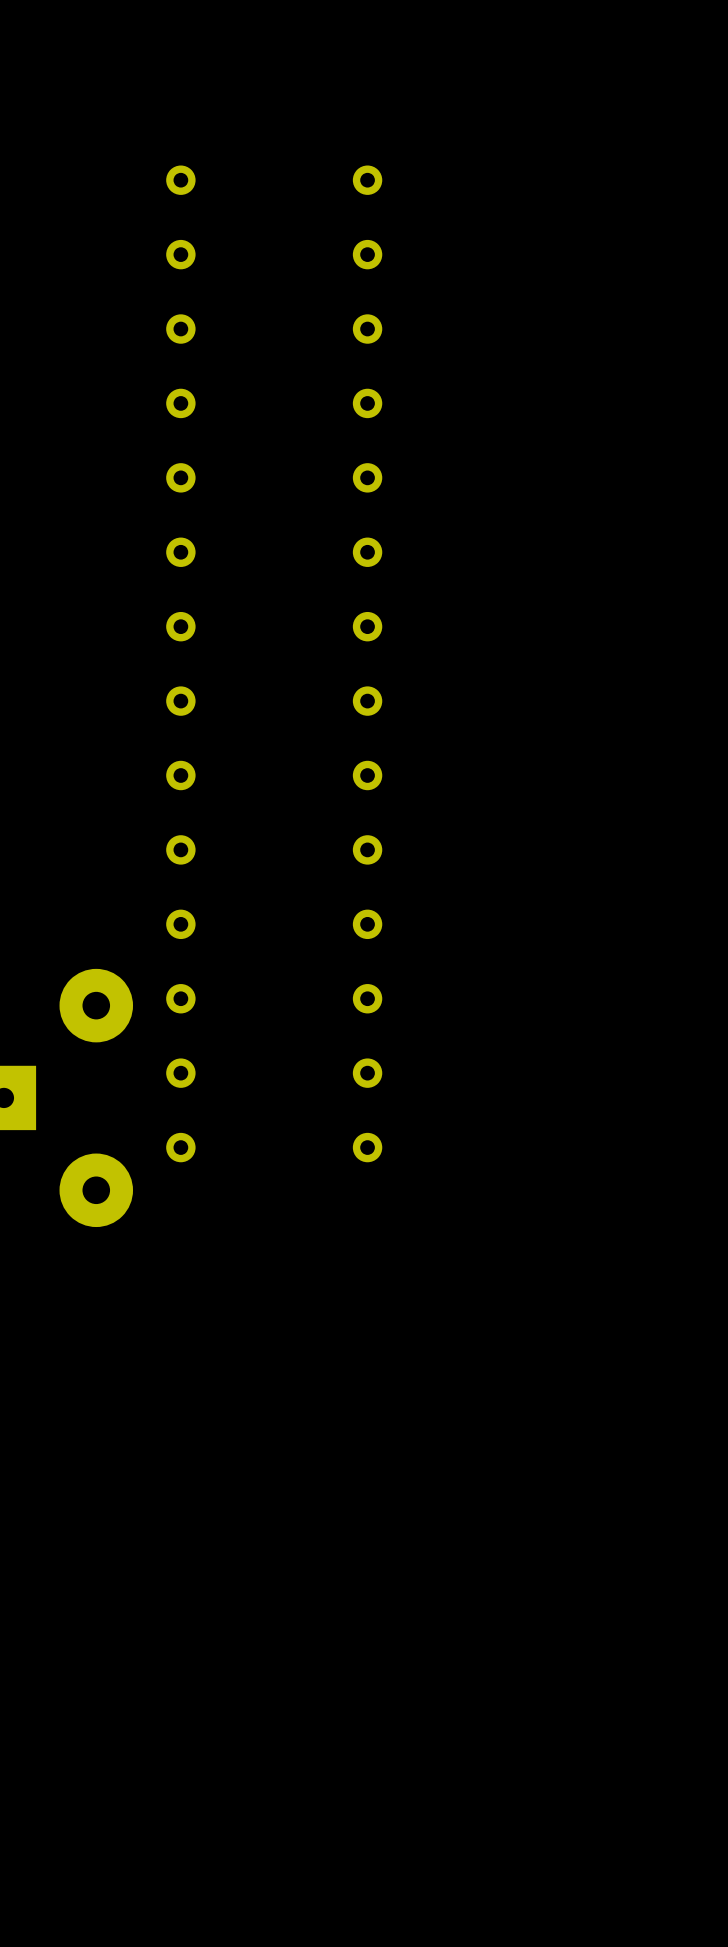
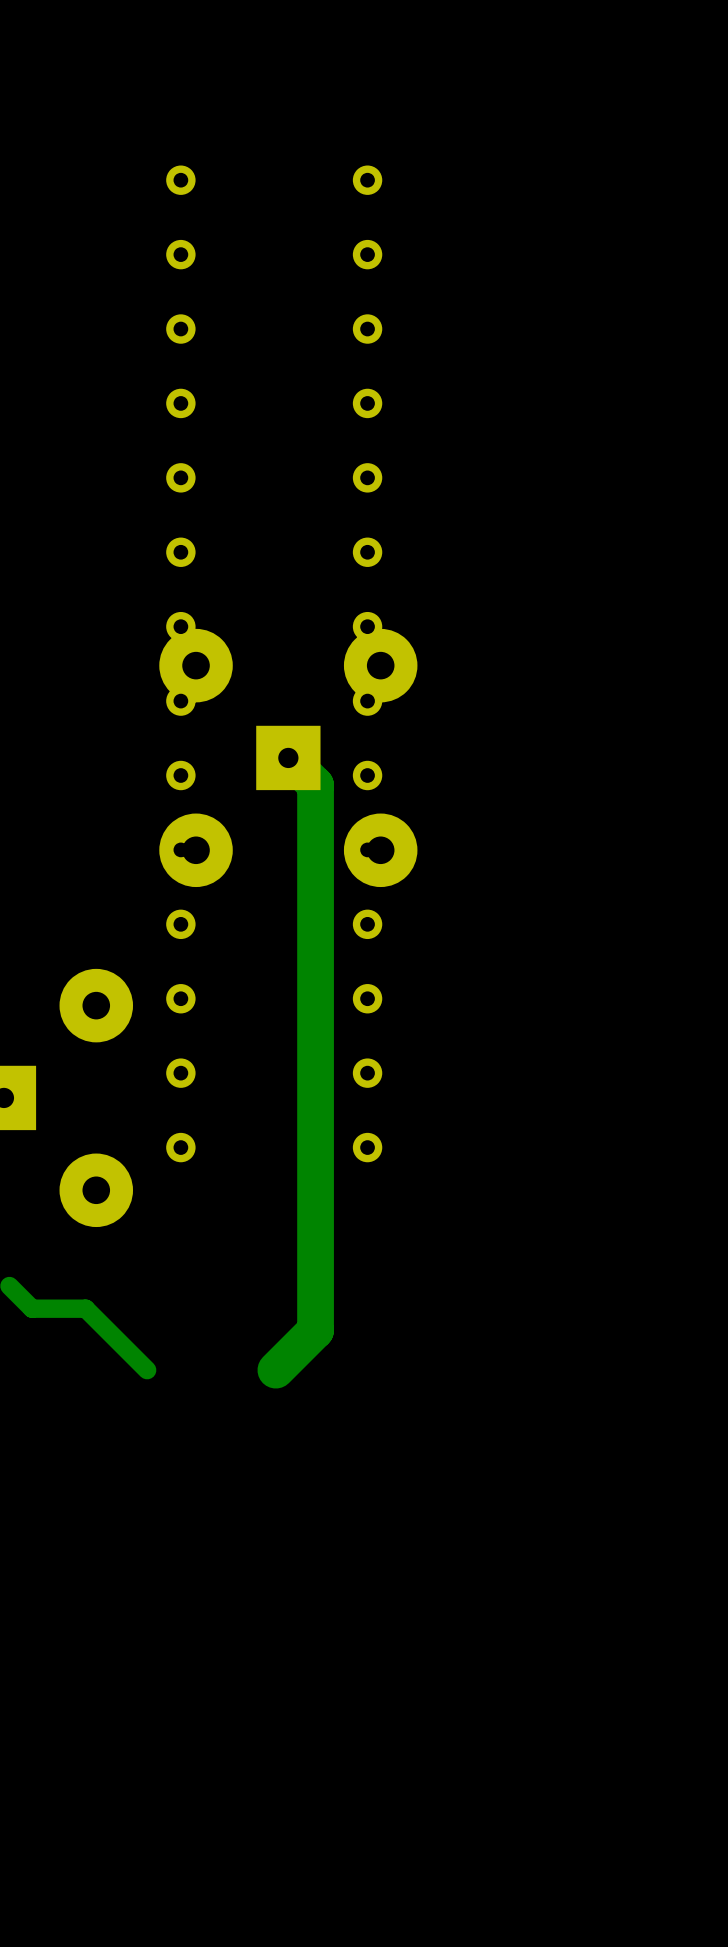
track: none -> (288, 757) (315, 785) (315, 1330) (275, 1370)
part: none -> (288, 757)
track: none -> (9, 1286) (32, 1308) (85, 1308) (147, 1370)

